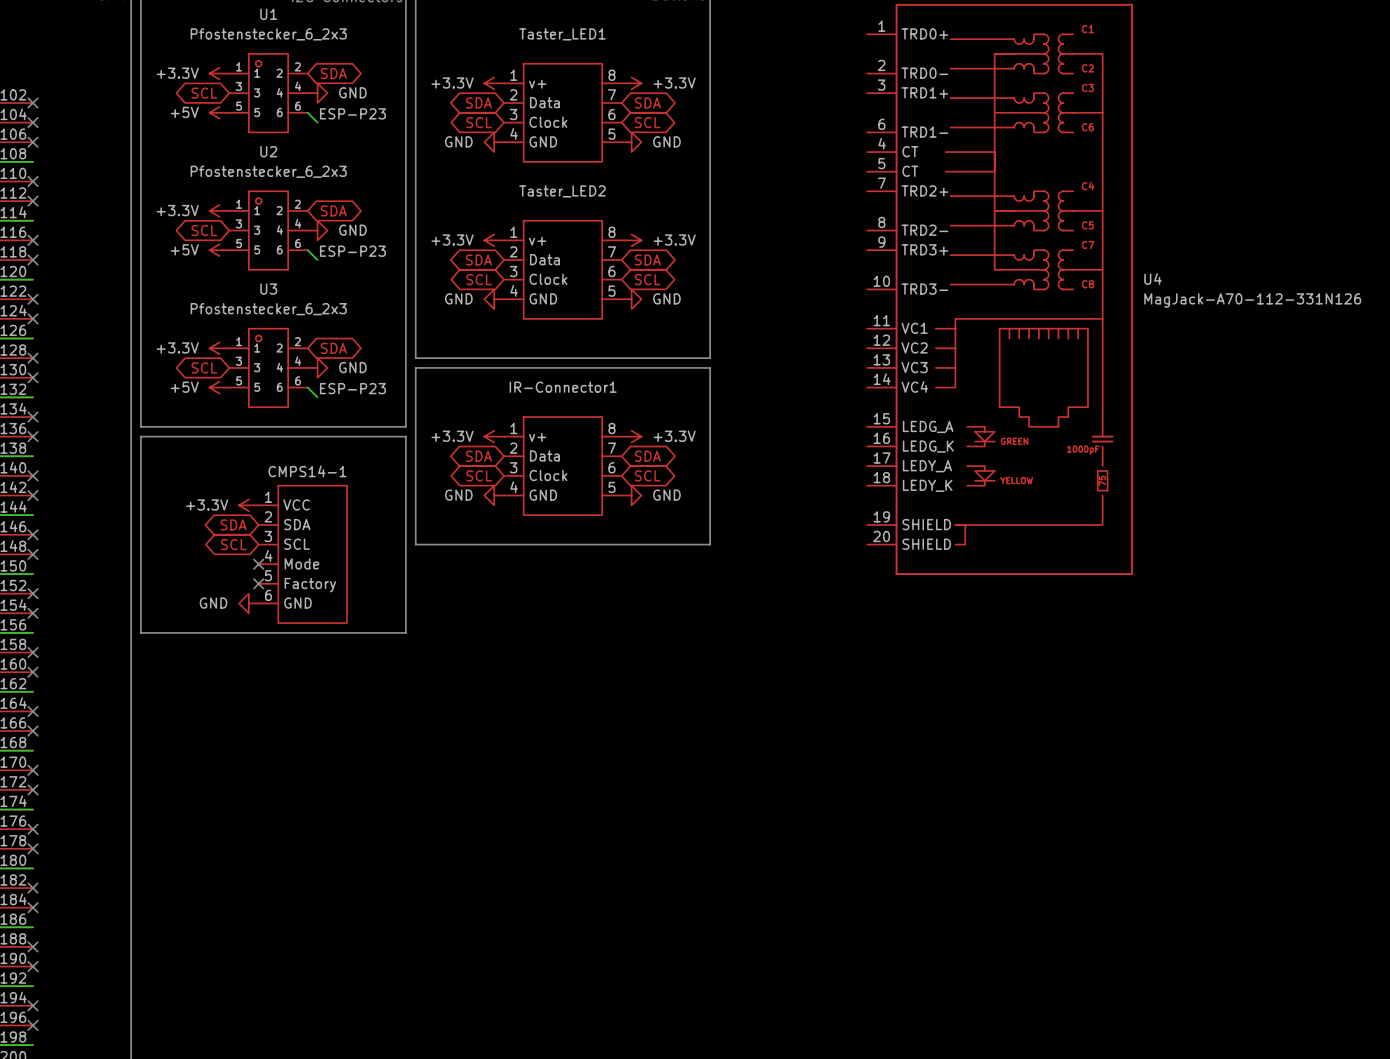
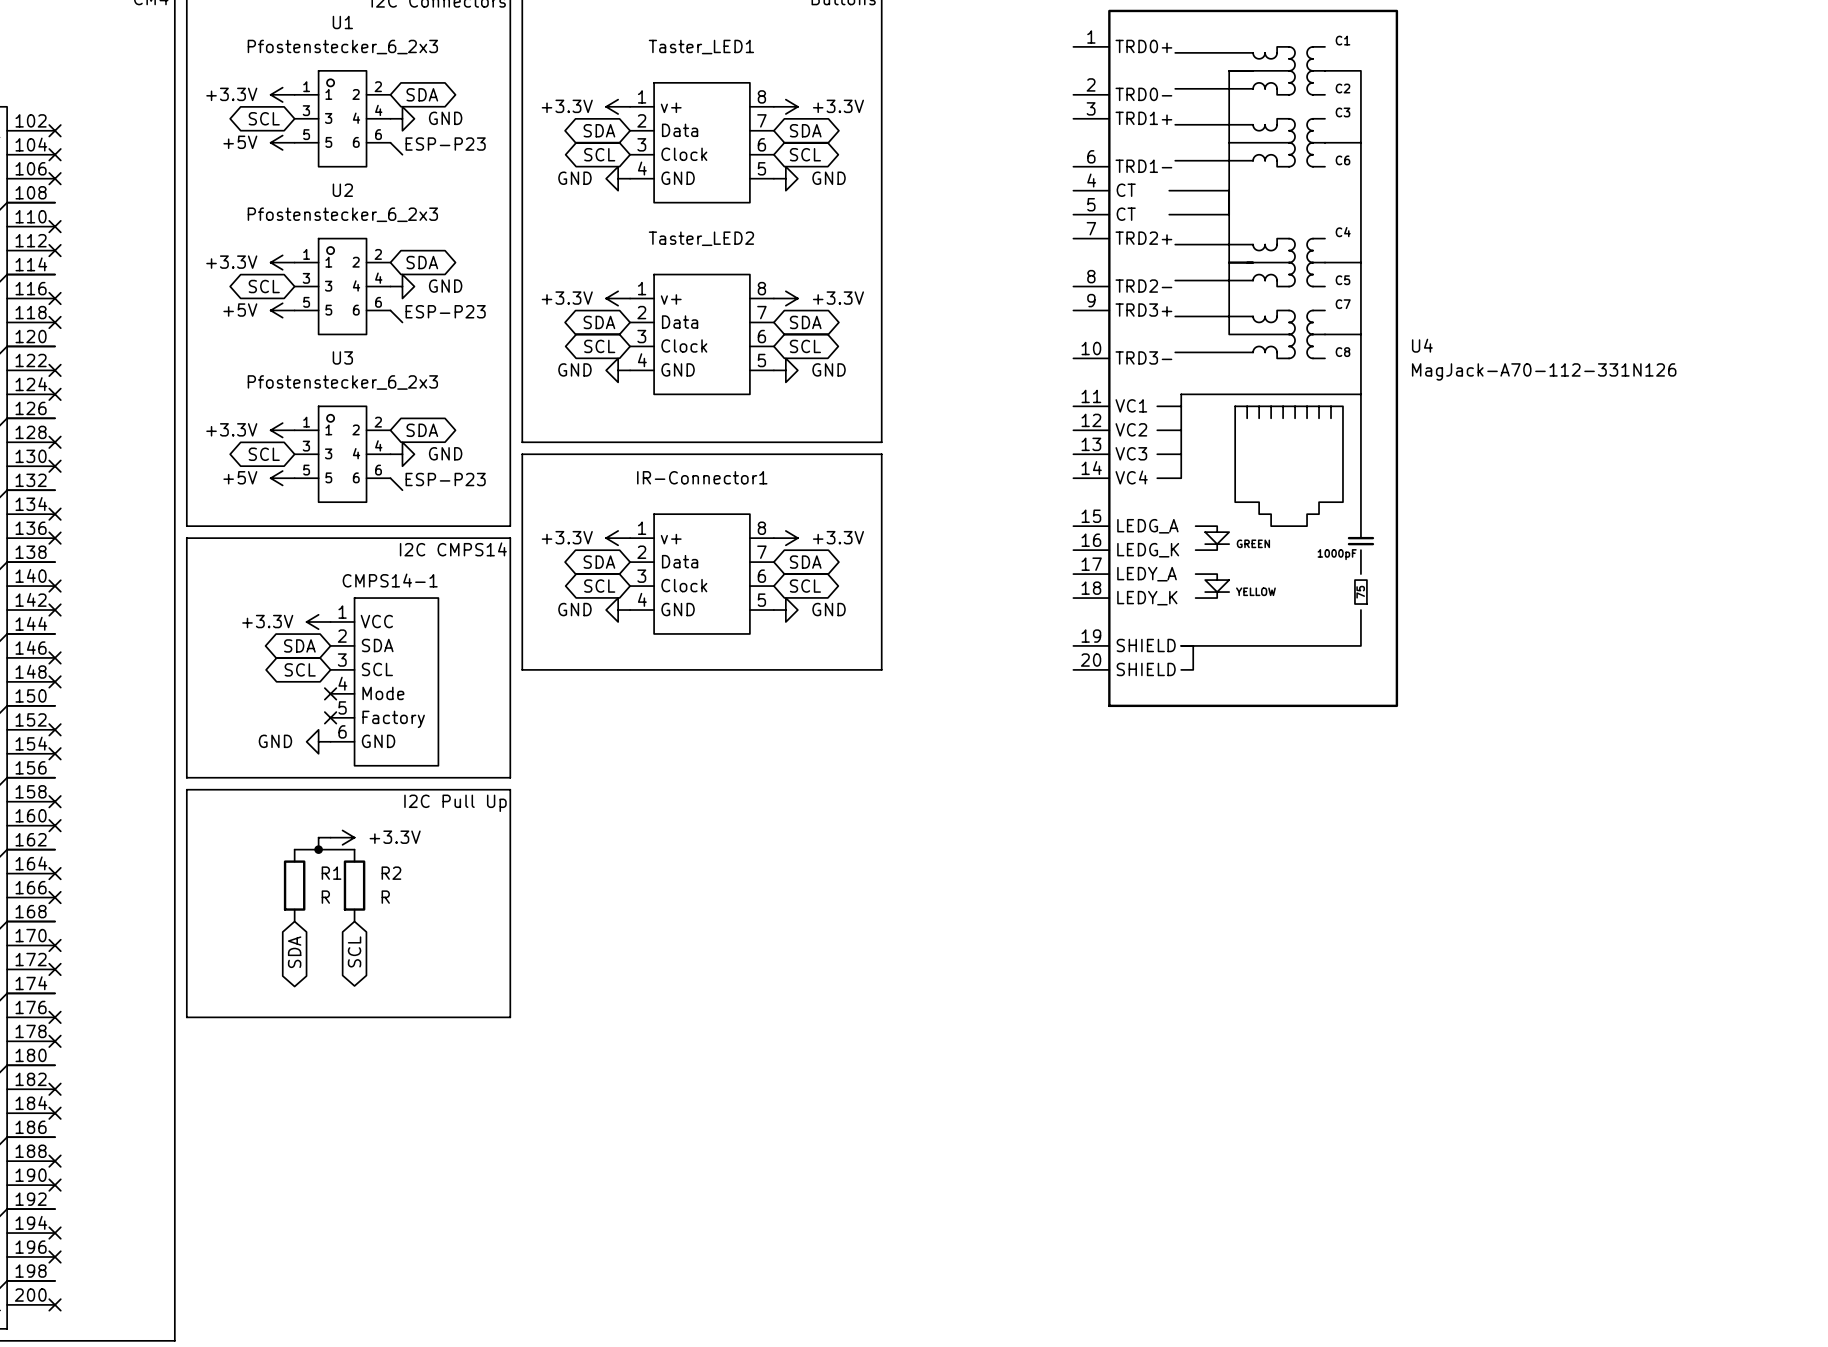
text: none -> I2C CMPS14 (453, 549)
line: none -> (186, 789) (510, 789) (510, 1017) (186, 1017) (186, 789)
text: none -> I2C Pull Up (455, 803)
wire: none -> (330, 837) (318, 837) (318, 849)
power symbol: none -> +3.3V (342, 837)
wire: none -> (294, 849) (354, 849)
junction: none -> (318, 849)
R1: none -> R (294, 885)
R2: none -> R (354, 885)
global label: none -> SDA (294, 952)
global label: none -> SCL (354, 951)

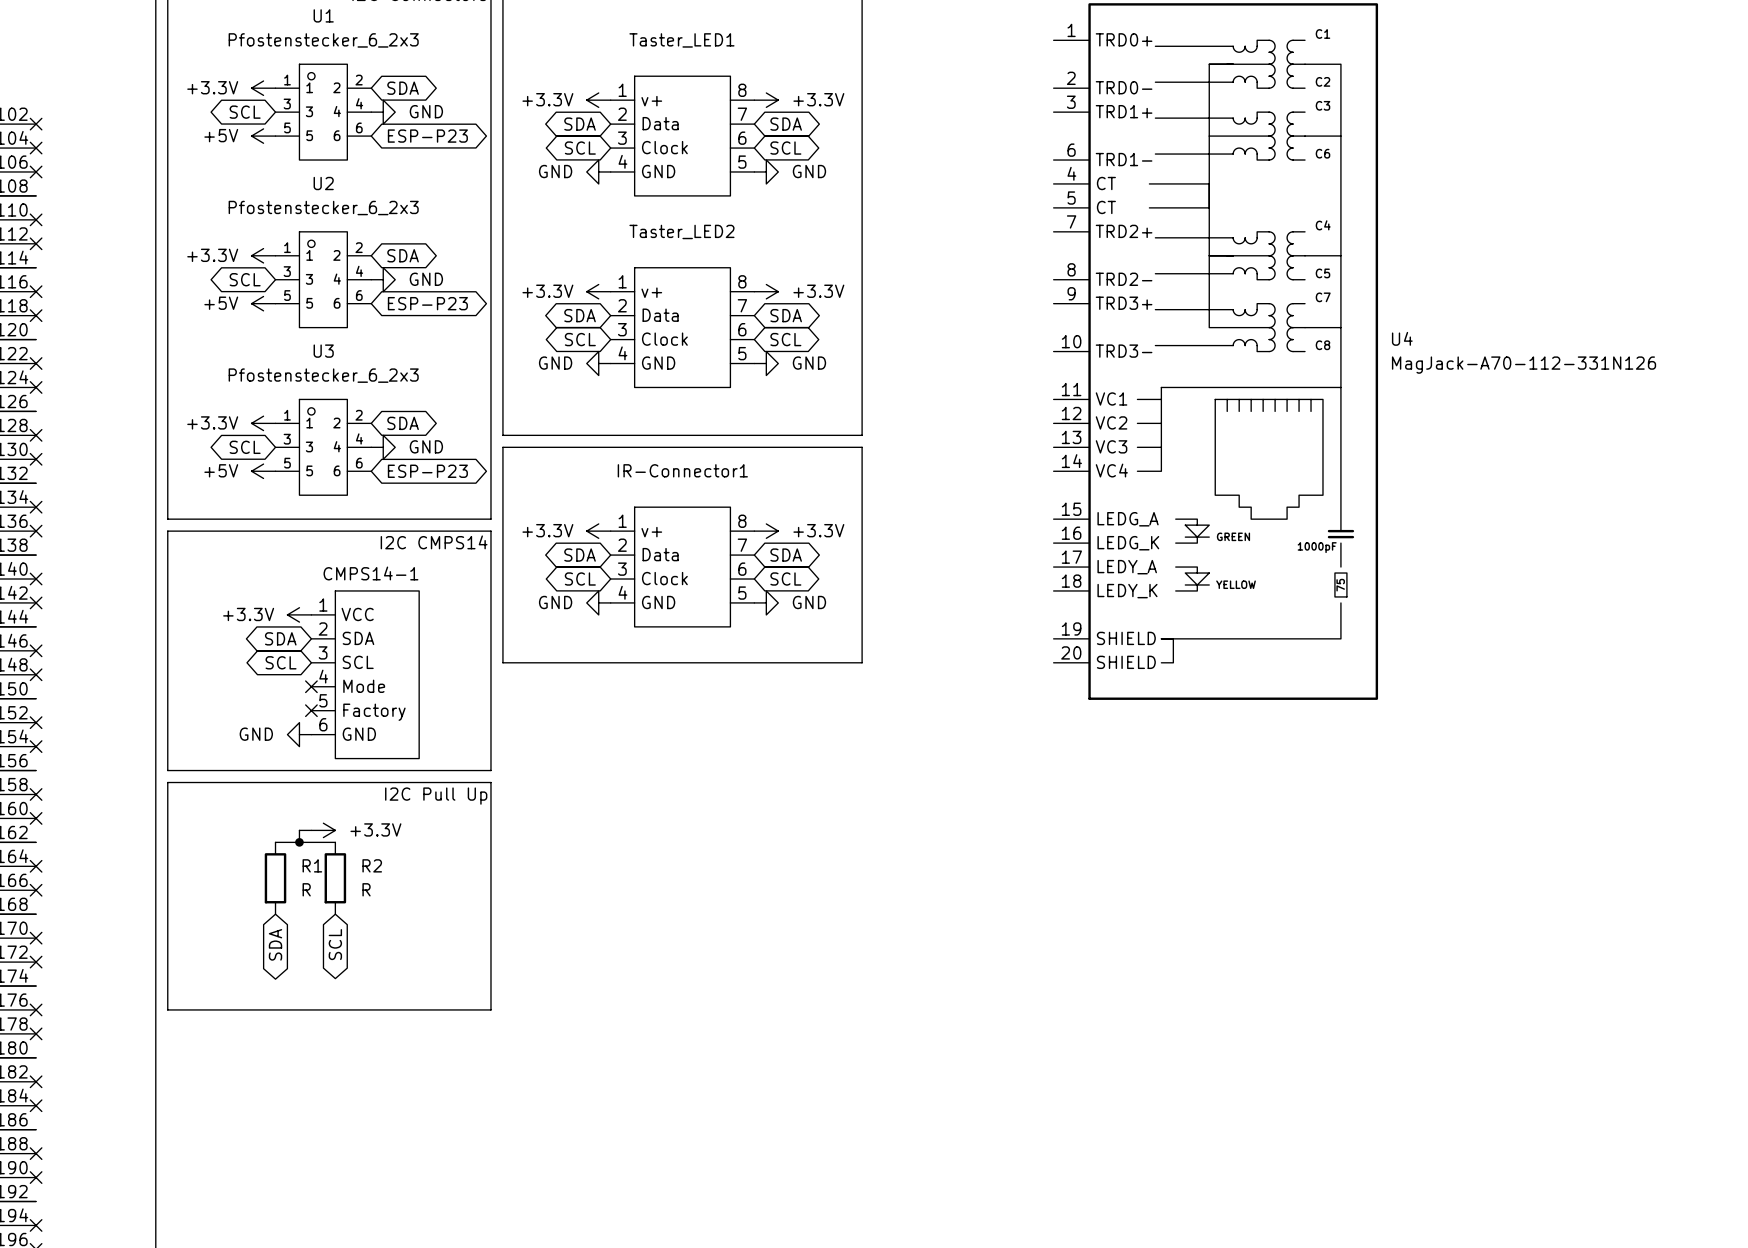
global label: none -> ESP-P23 (427, 136)
label: ESP-P23 (445, 144) -> none
global label: none -> ESP-P23 (427, 303)
label: ESP-P23 (445, 311) -> none
global label: none -> ESP-P23 (427, 471)
label: ESP-P23 (445, 479) -> none

